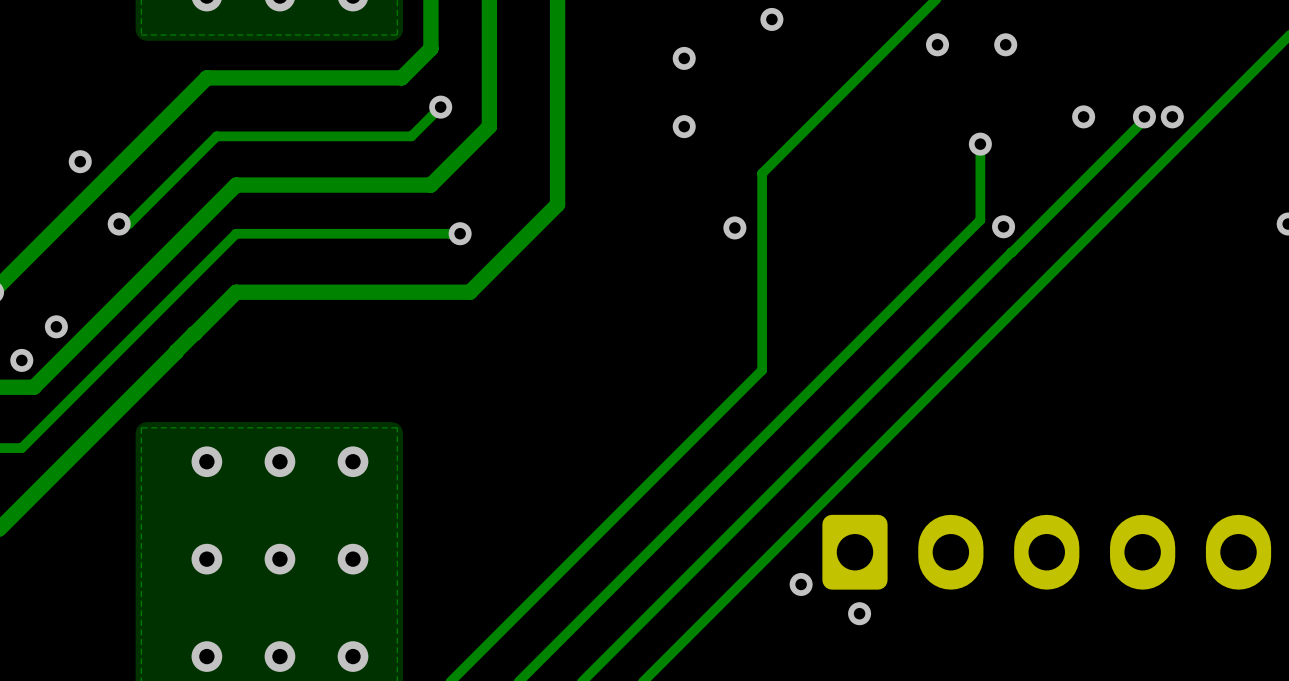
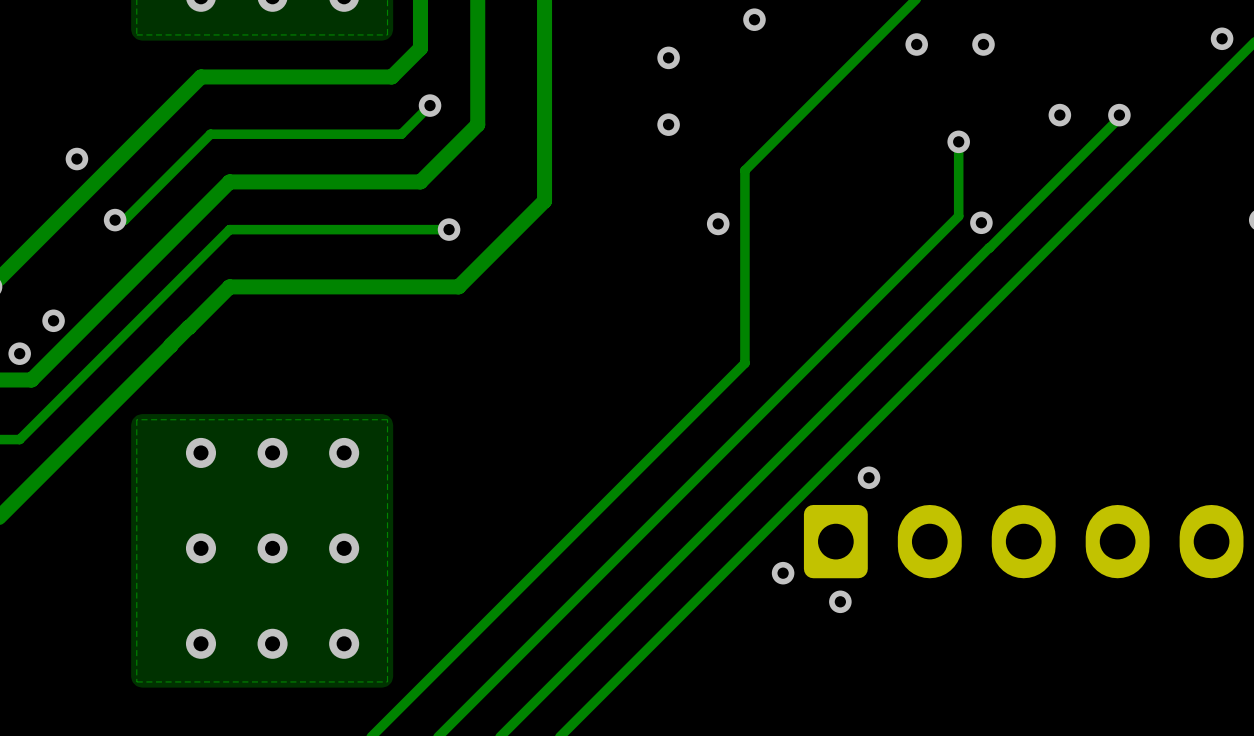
via: none -> (1222, 38)
via: (1172, 116) -> none
via: none -> (868, 477)

